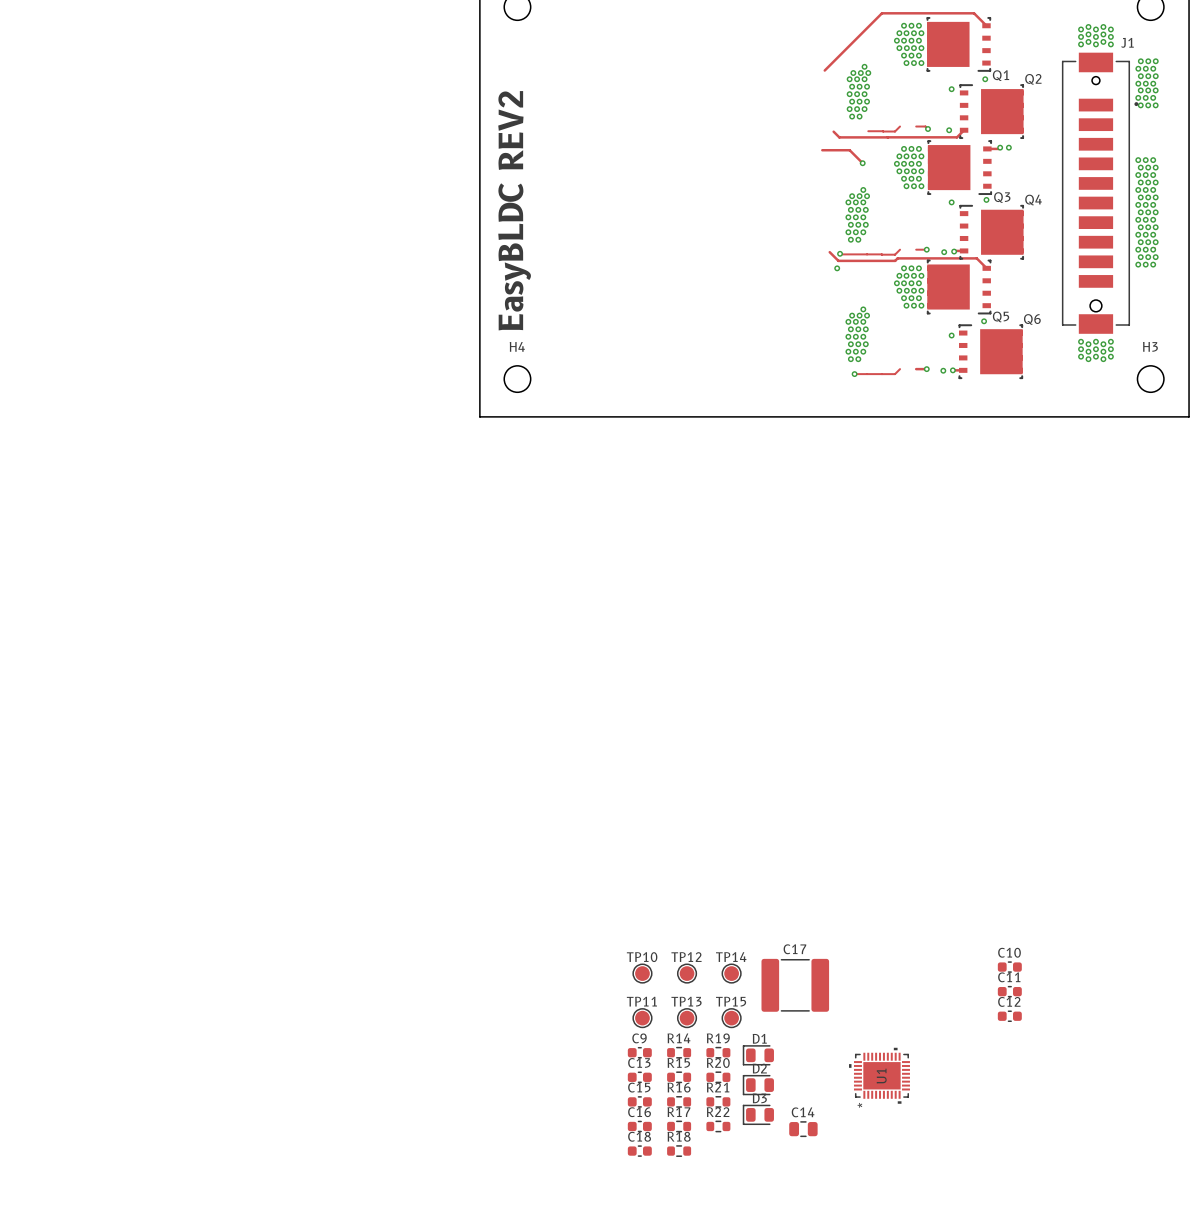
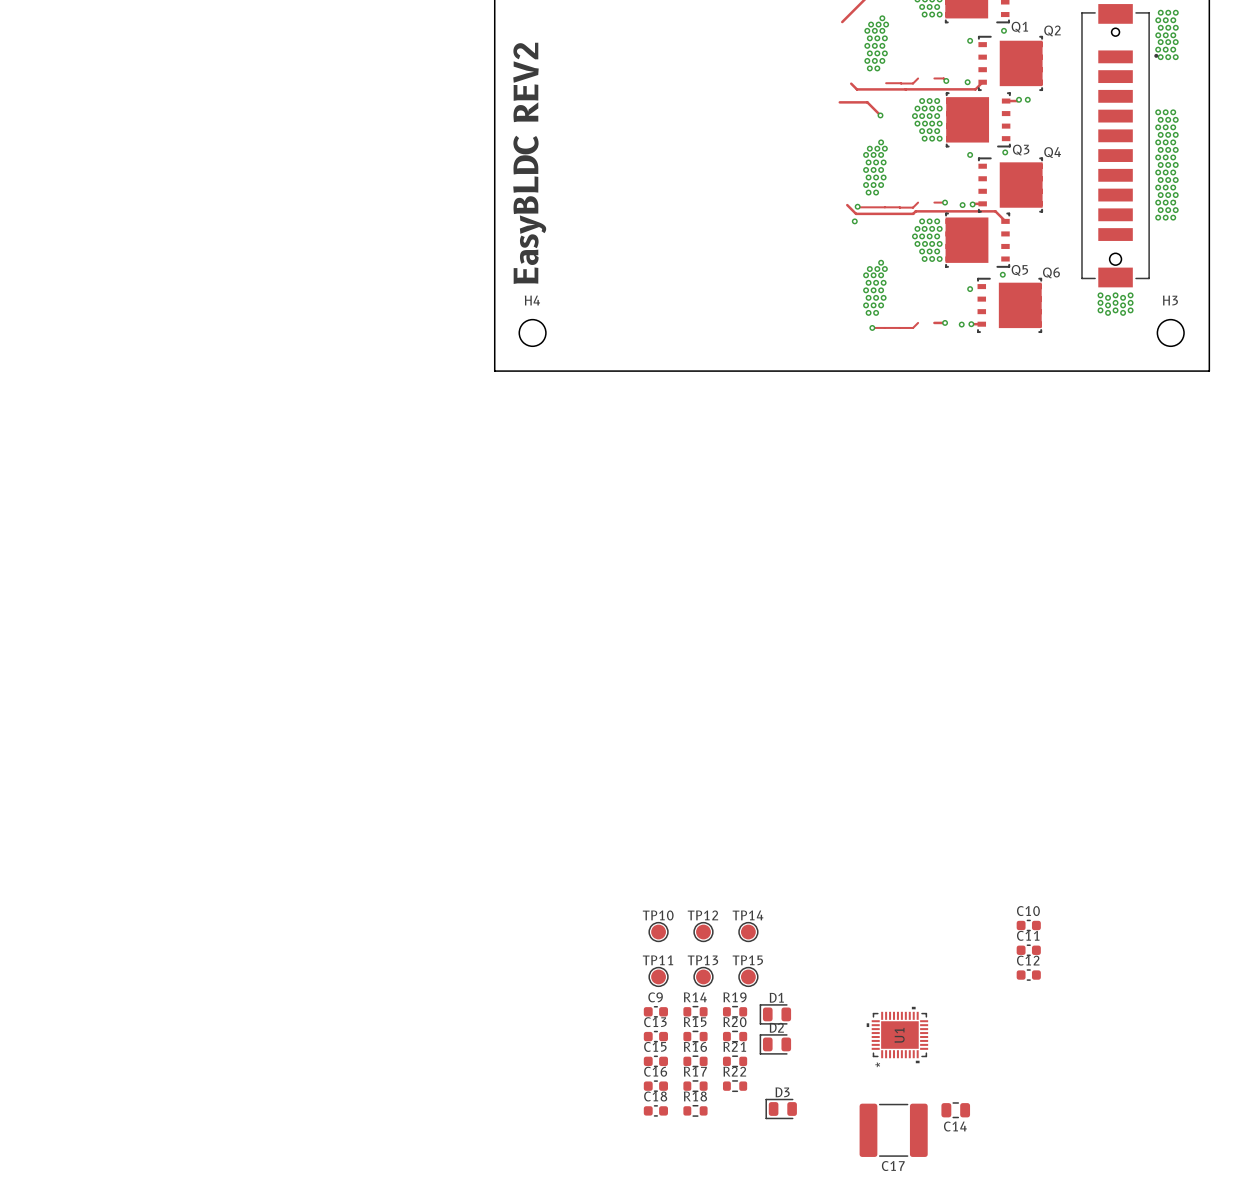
C17 name position: C17 (794, 949) -> C17 (893, 1166)
C17 position: (795, 985) -> (893, 1130)
C14 name position: C14 (803, 1112) -> C14 (955, 1126)
D3 position: (758, 1114) -> (781, 1108)
C14 position: (803, 1129) -> (955, 1110)

